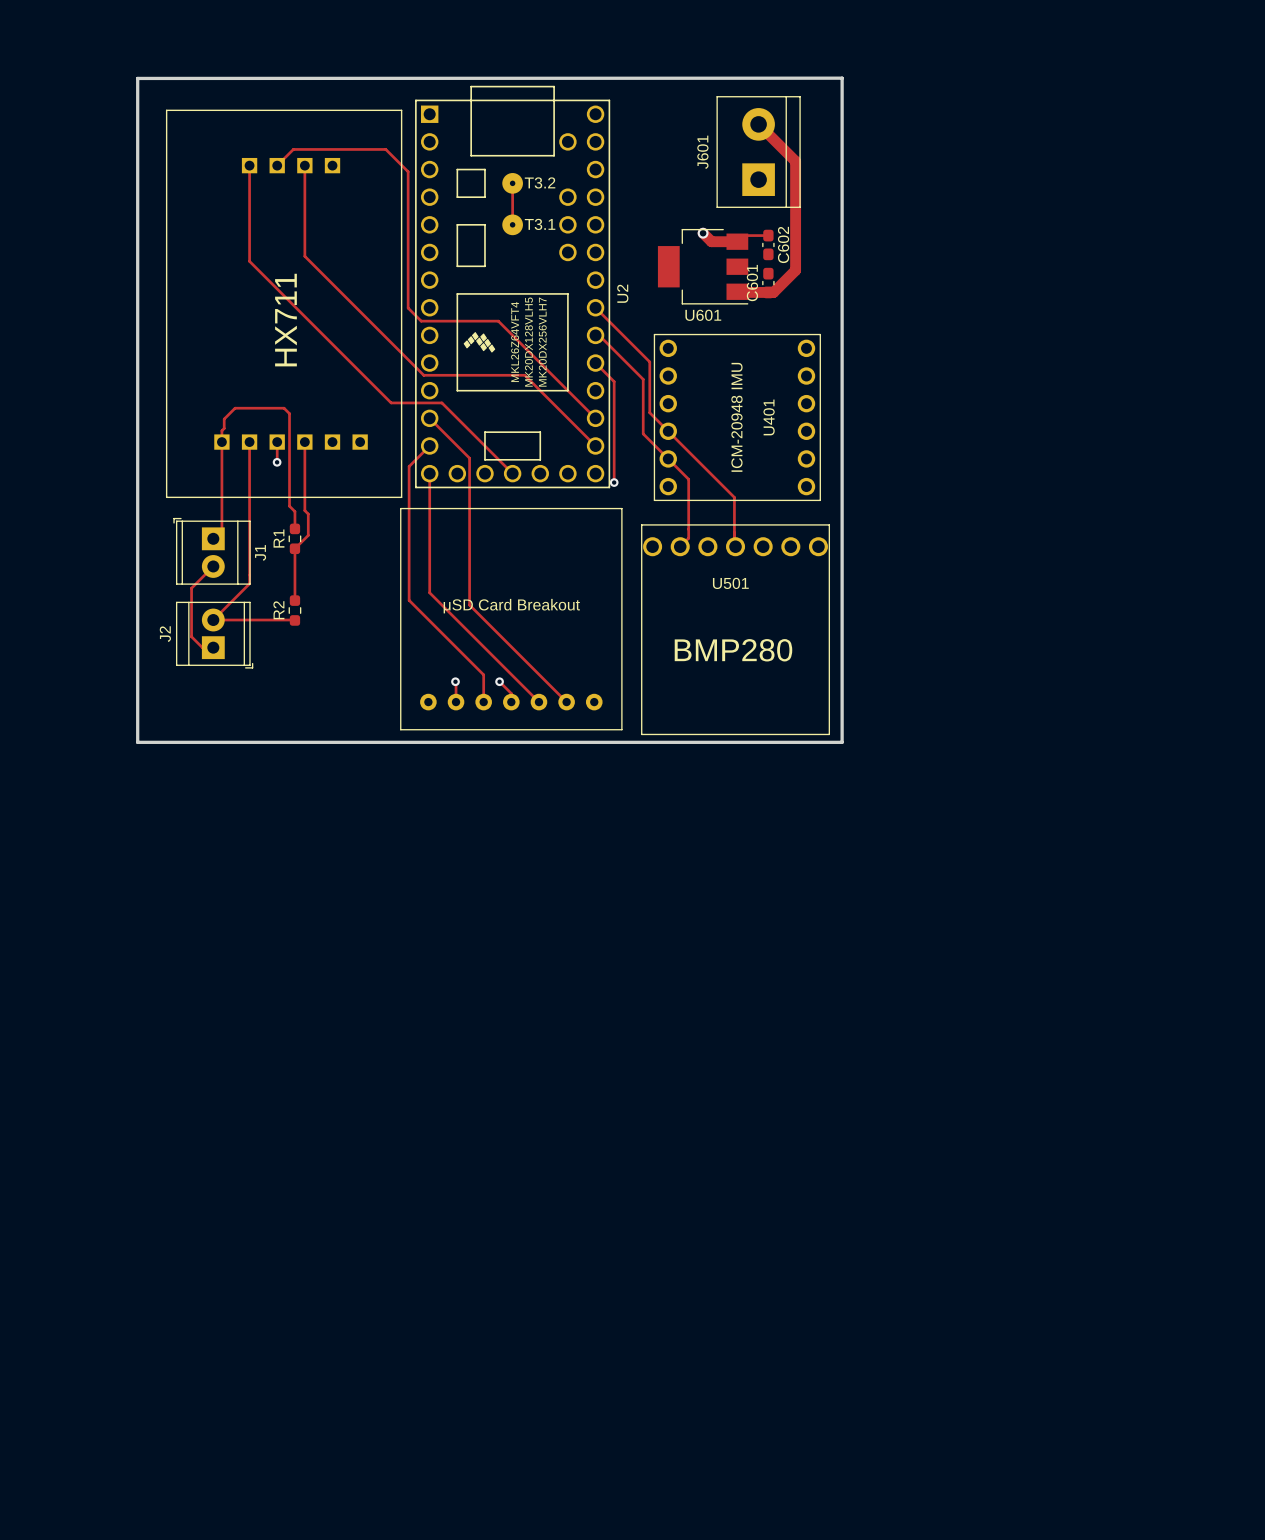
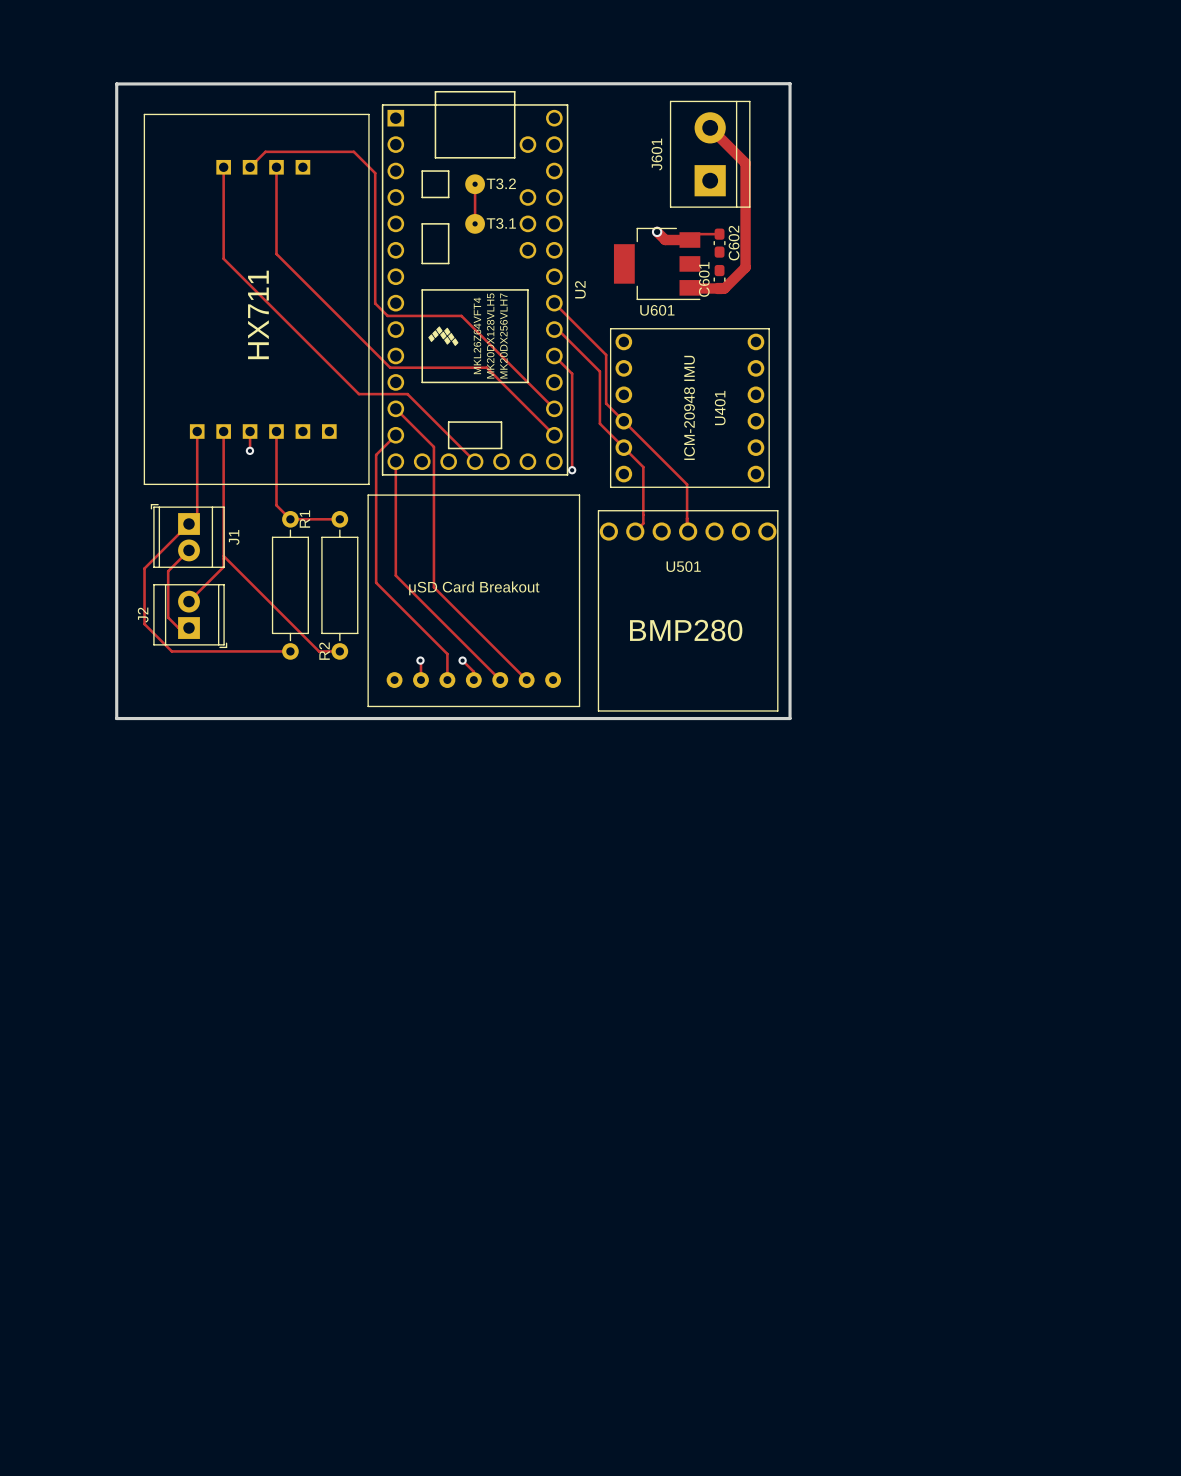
track: (221, 442) (224, 419) (235, 408) (284, 408) (289, 413) (289, 506) (294, 511) (294, 528) -> none
track: (304, 510) (308, 514) (308, 535) (294, 548) (294, 600) -> (276, 497) (276, 505) (290, 519) (339, 519)
R1 footprint: [288, 523, 302, 555] -> [271, 510, 309, 660]
track: none -> (189, 524) (144, 568) (144, 624) (171, 651) (290, 651)
R1 name position: R1 (278, 538) -> R1 (304, 519)
track: none -> (223, 556) (319, 651) (339, 651)
R2 footprint: [288, 595, 302, 626] -> [321, 510, 359, 660]
R2 name position: R2 (278, 610) -> R2 (324, 651)
track: (213, 620) (294, 620) -> none

